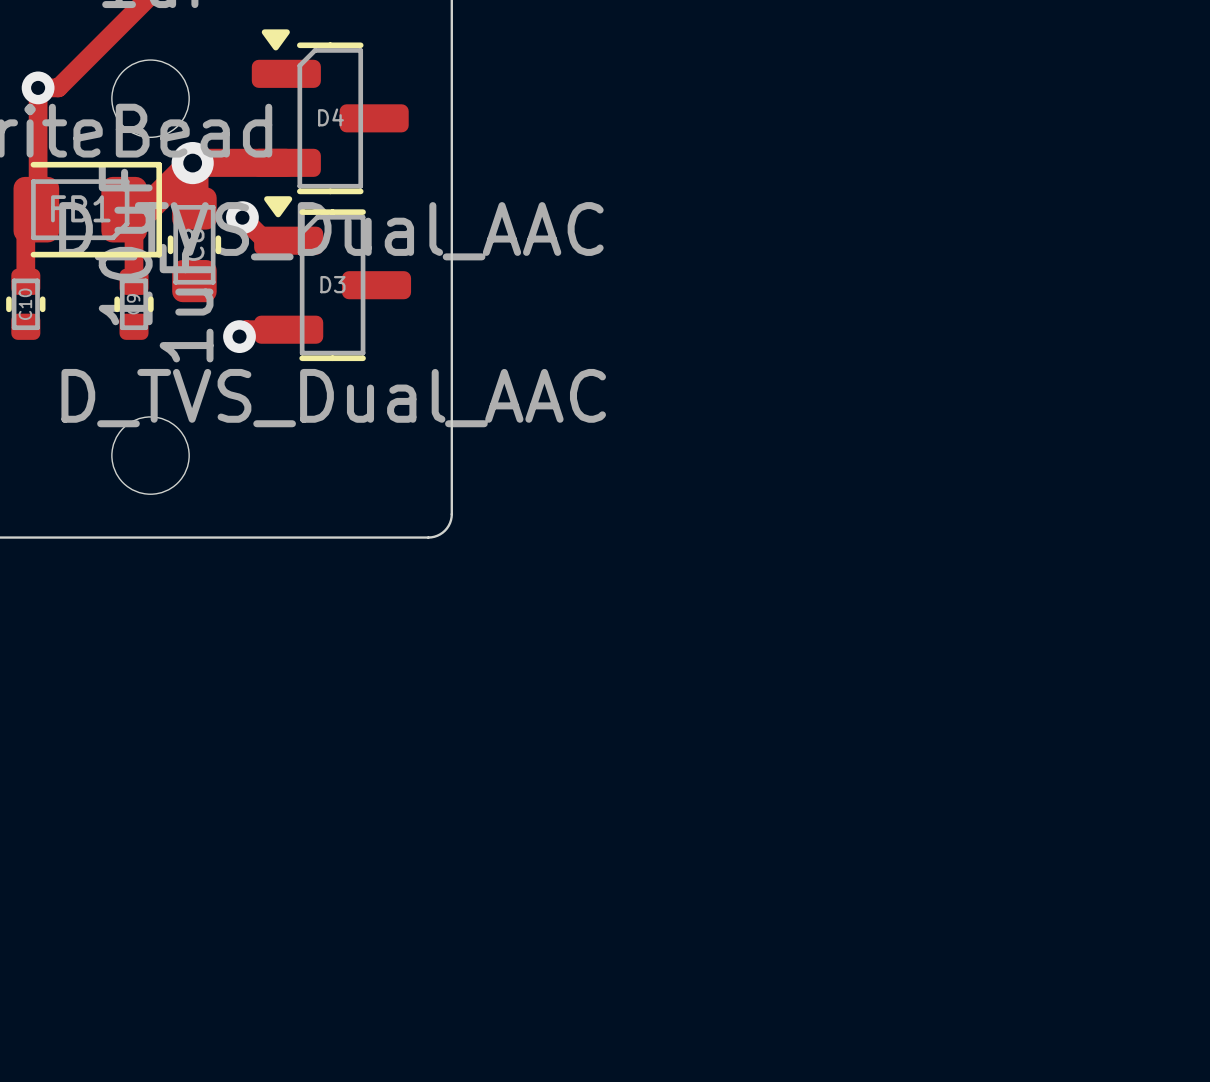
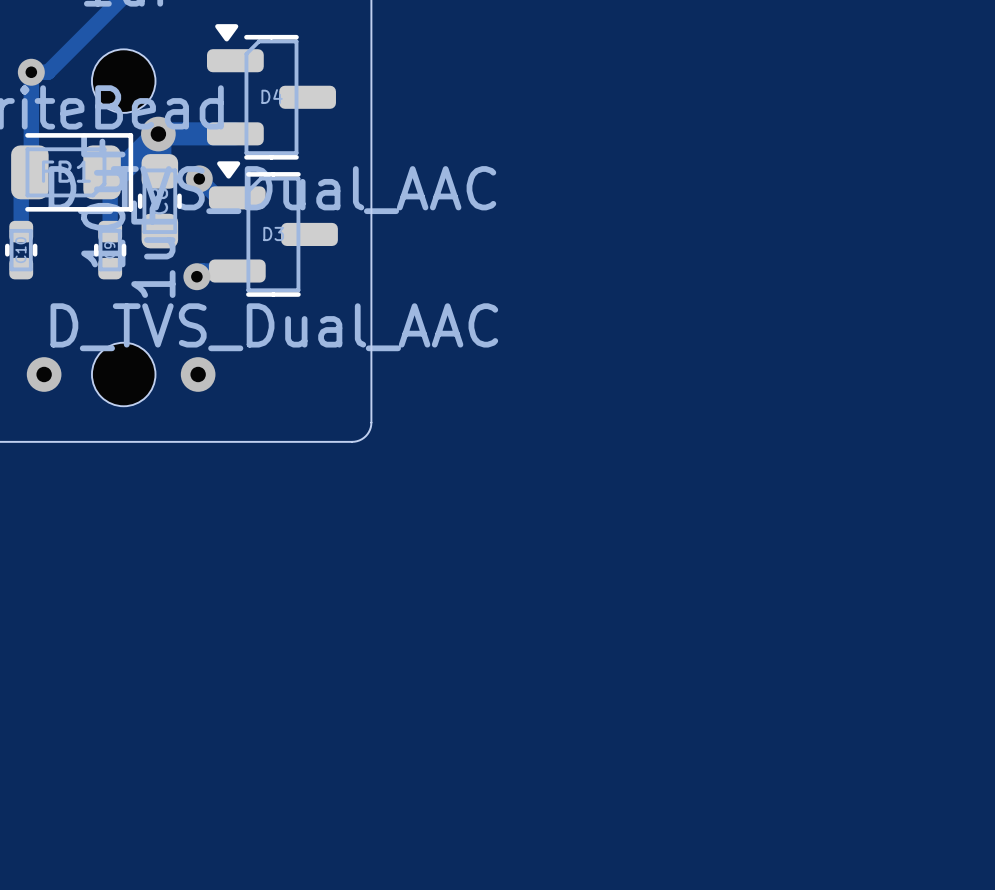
via: none -> (44, 374)
via: none -> (198, 374)

